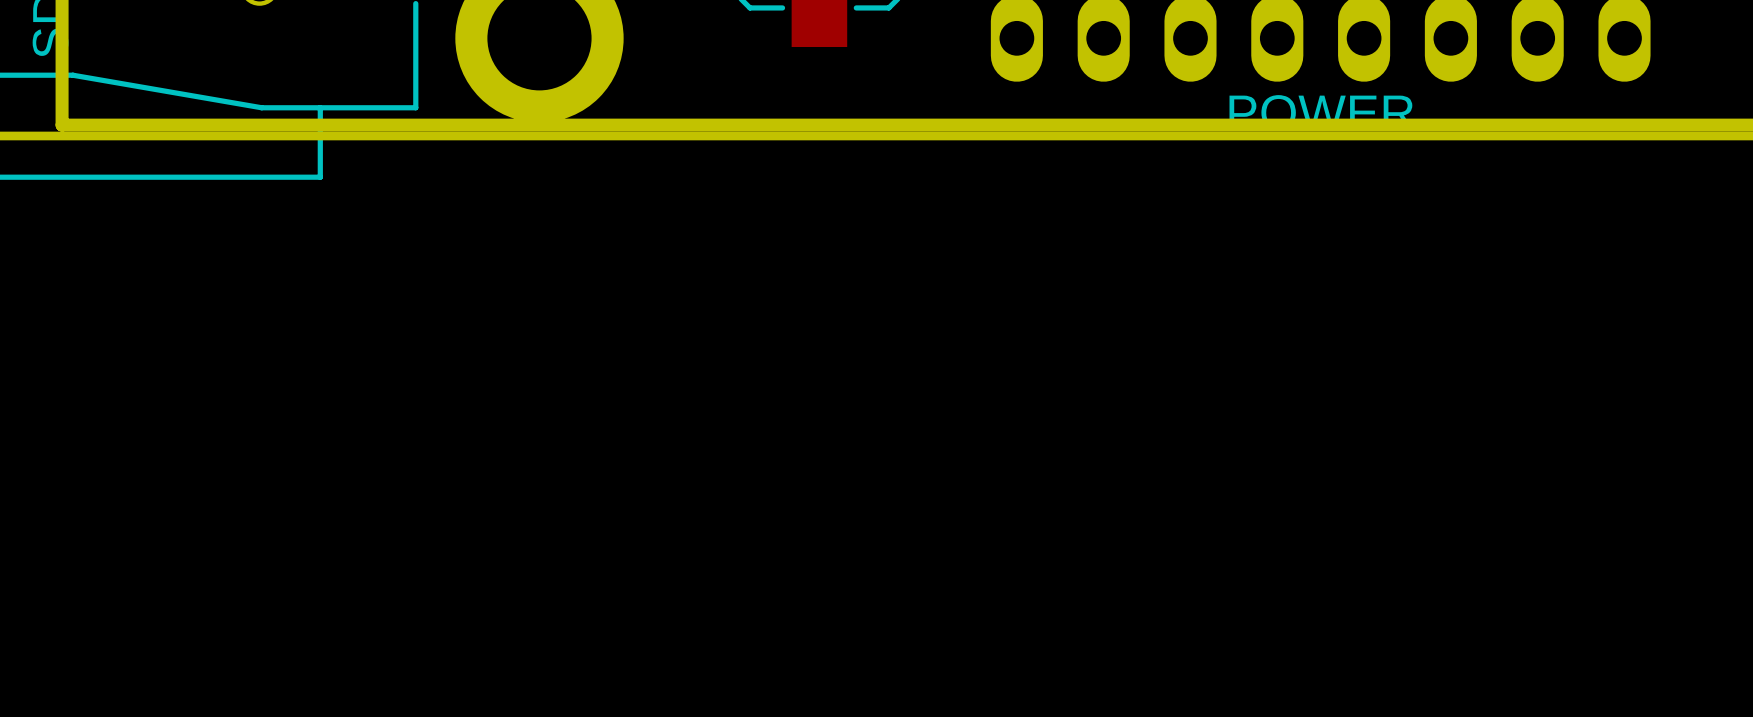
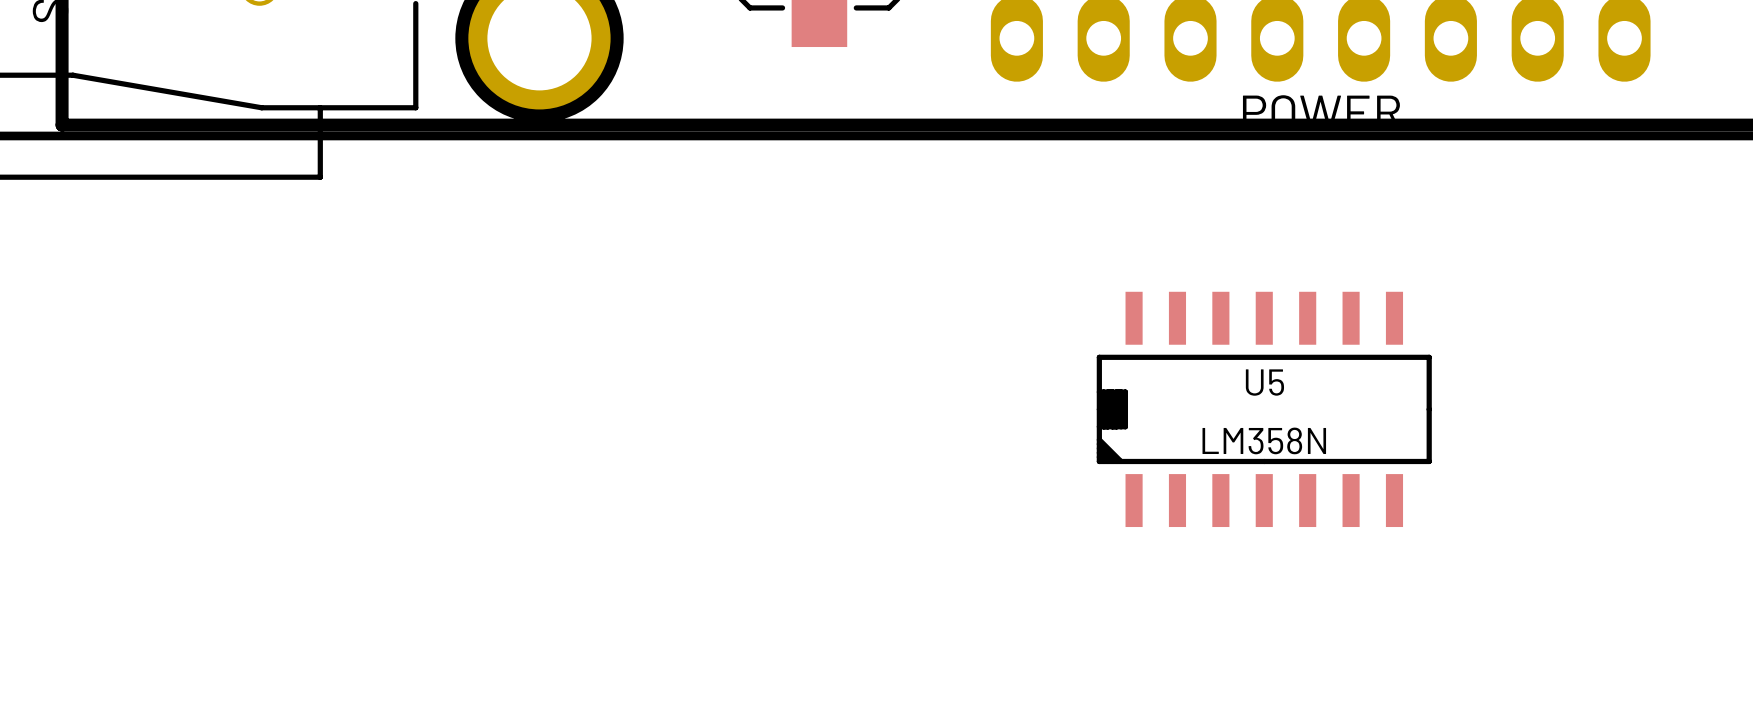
U5: none -> LM358N (1264, 409)

